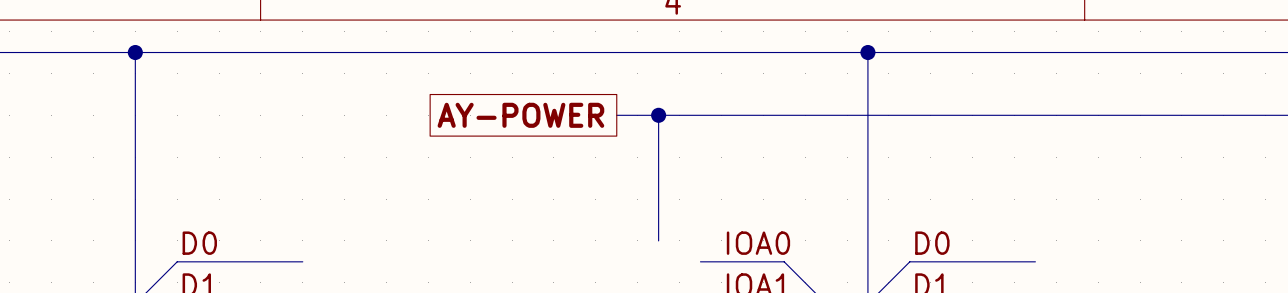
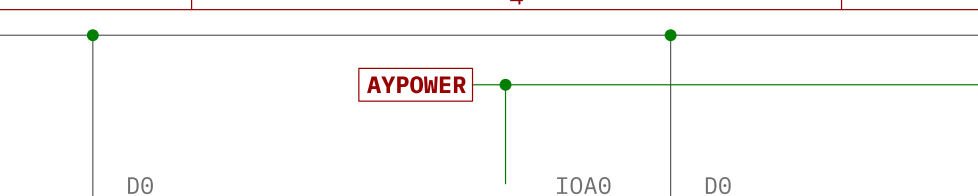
global label: AY-POWER (520, 115) -> AYPOWER (416, 84)

